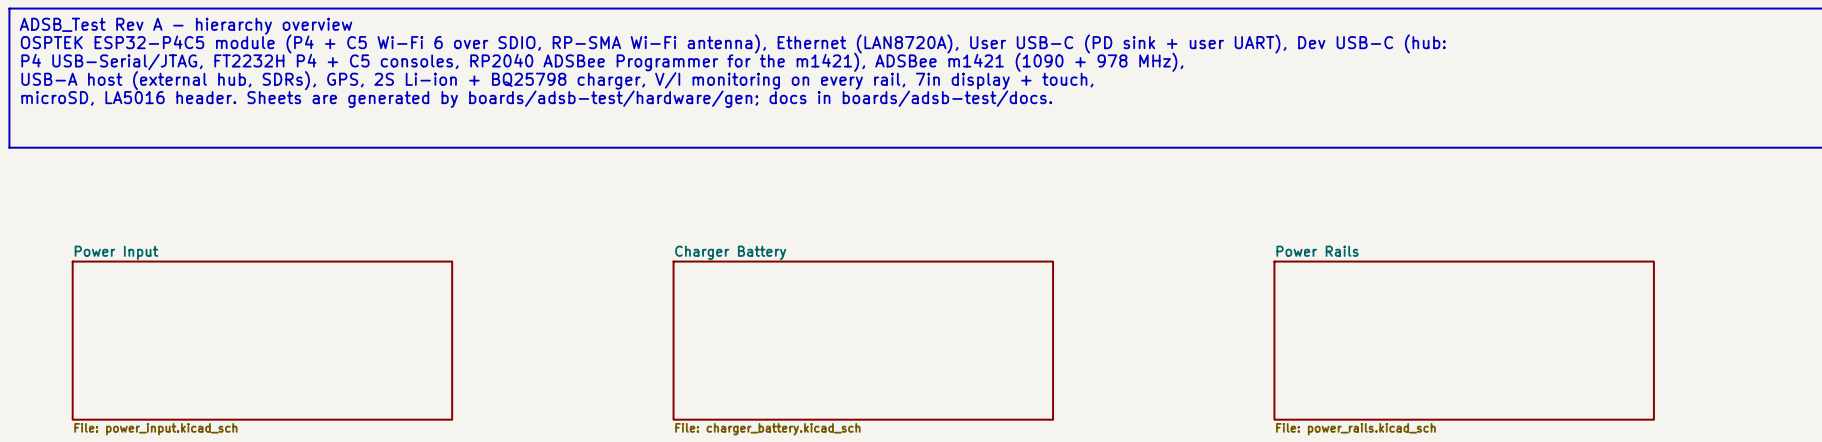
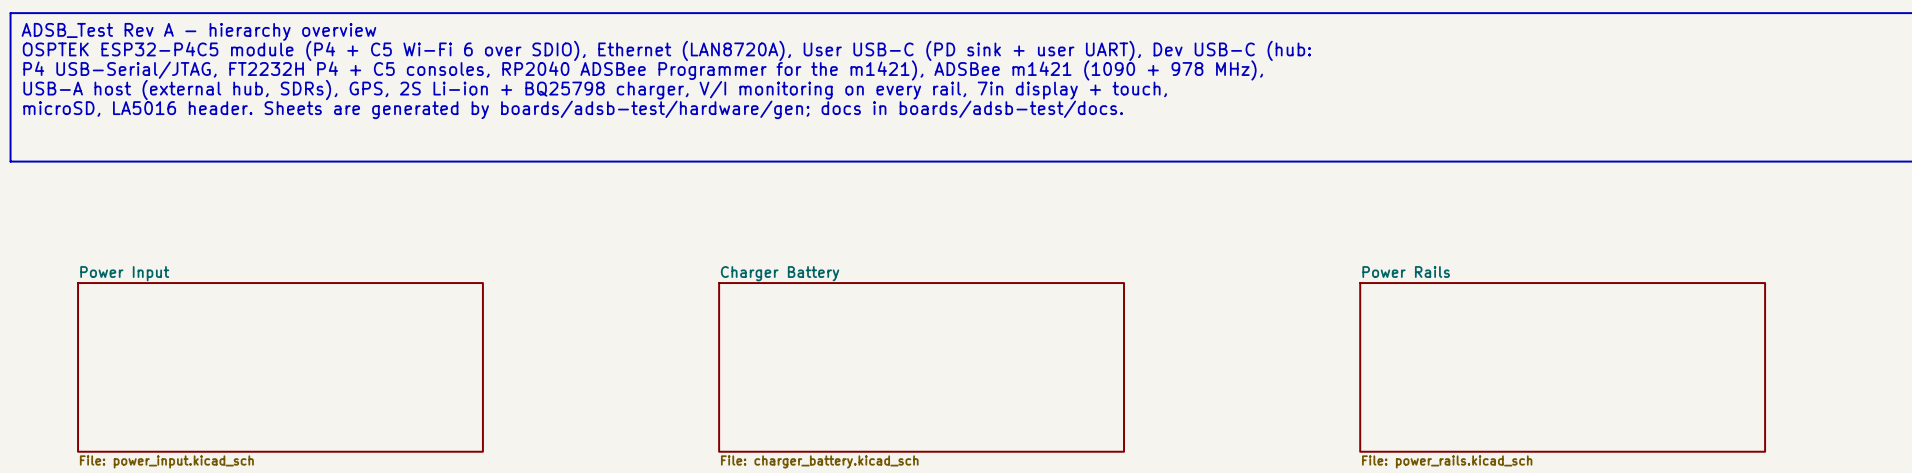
text: OSPTEK ESP32-P4C5 module (P4 + C5 Wi-Fi 6 over SDIO, RP-SMA Wi-Fi antenna), Ethernet (LAN8720A), User USB-C (PD sink + user UART), Dev USB-C (hub: (733, 43) -> OSPTEK ESP32-P4C5 module (P4 + C5 Wi-Fi 6 over SDIO), Ethernet (LAN8720A), User USB-C (PD sink + user UART), Dev USB-C (hub: (666, 50)

